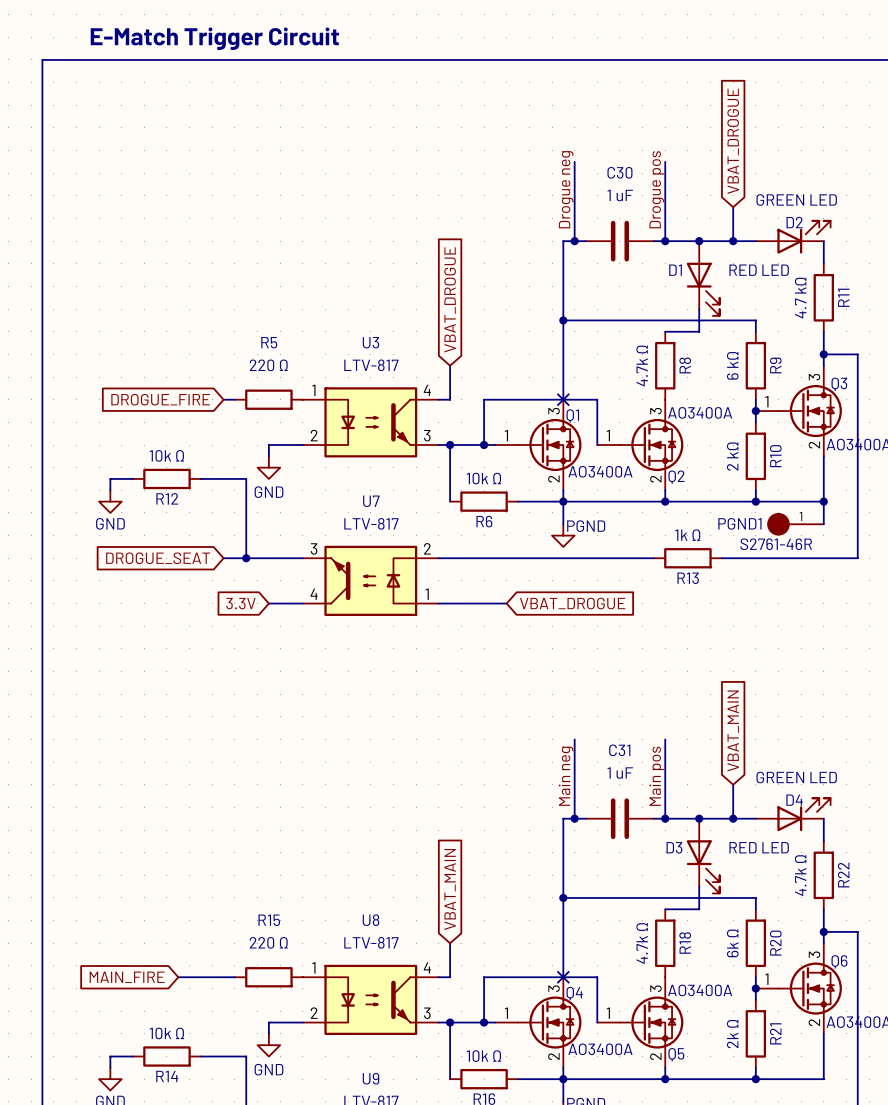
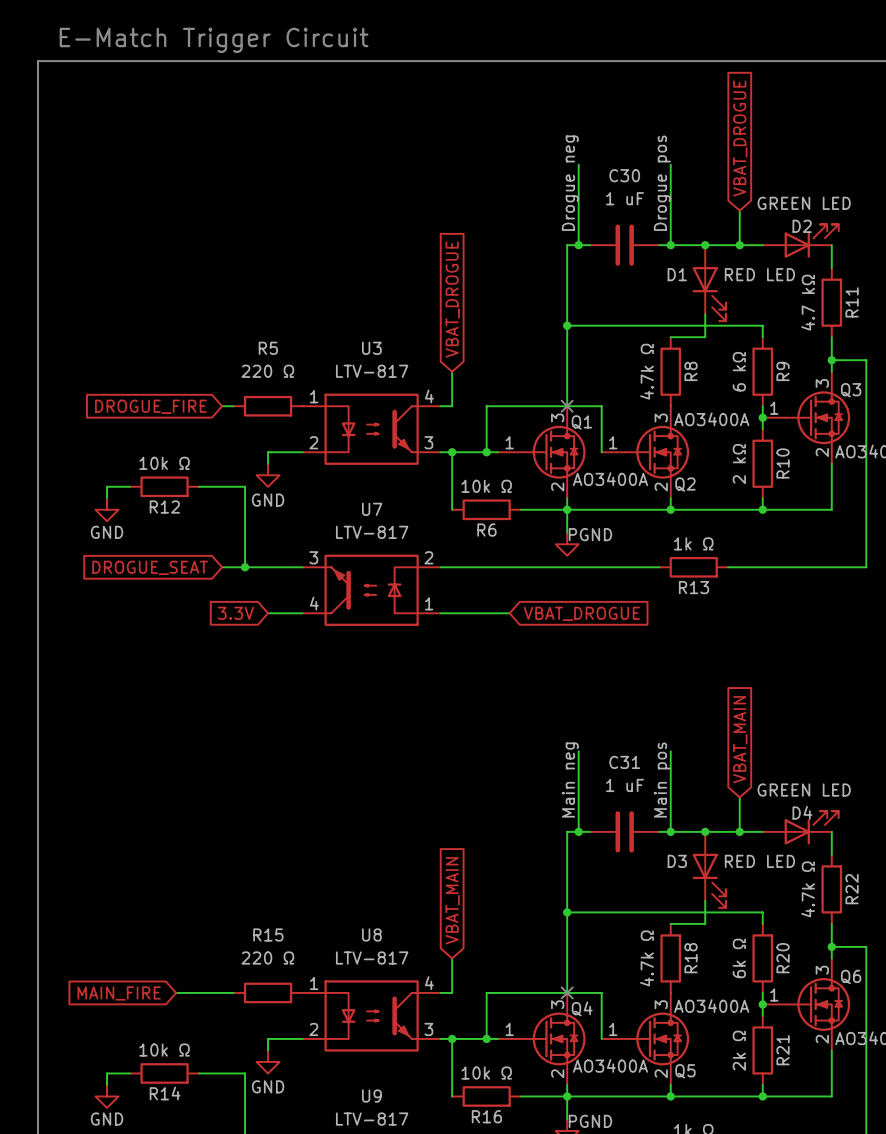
wire: (823, 501) (823, 524) -> none
junction: (823, 501) -> none
PGND1: S2761-46R (795, 524) -> none

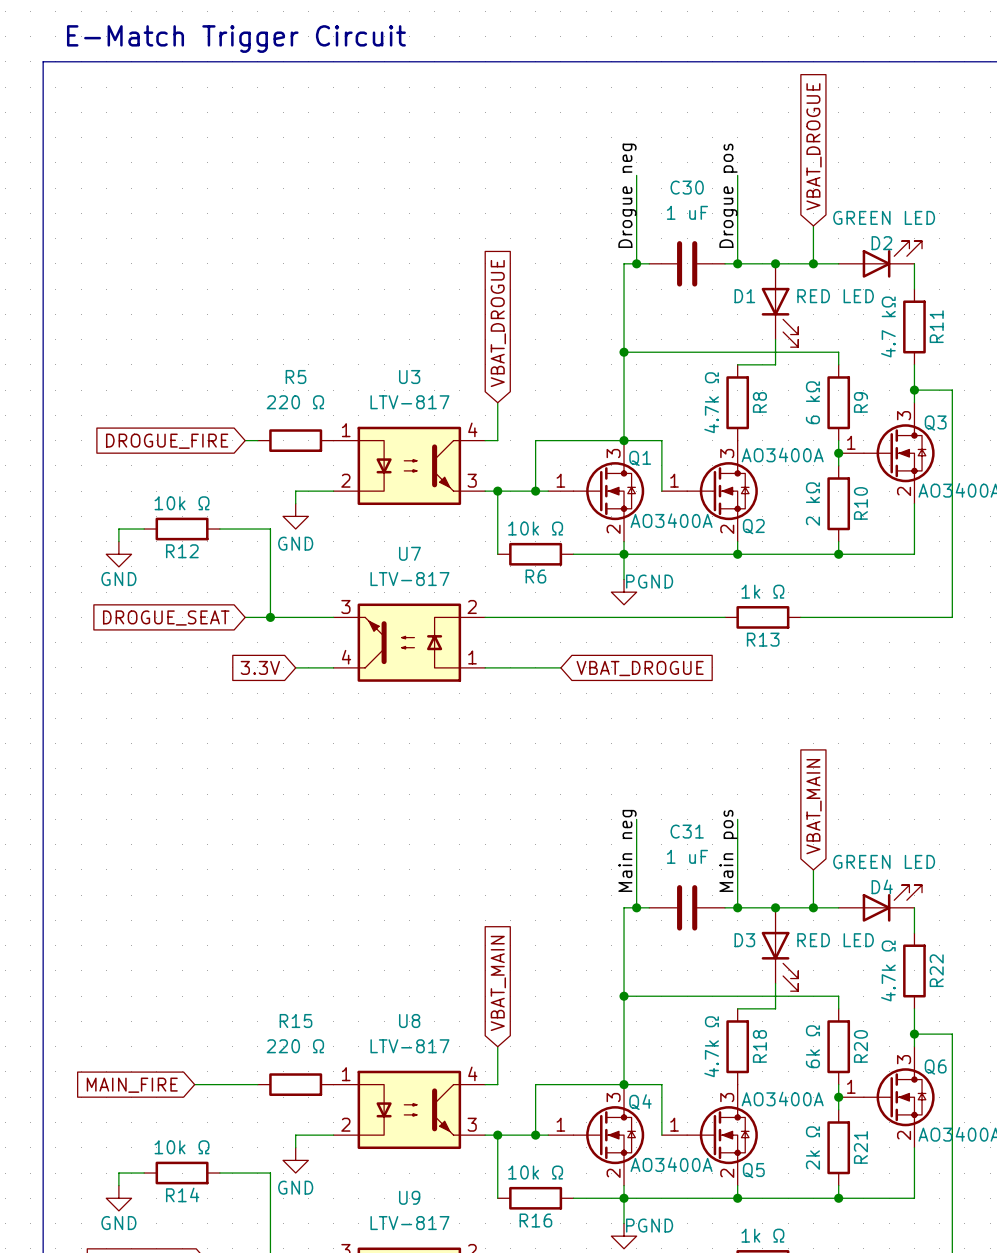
no-connect mark: (567, 406) -> none
junction: none -> (624, 440)
no-connect mark: (567, 992) -> none
junction: none -> (624, 1084)

